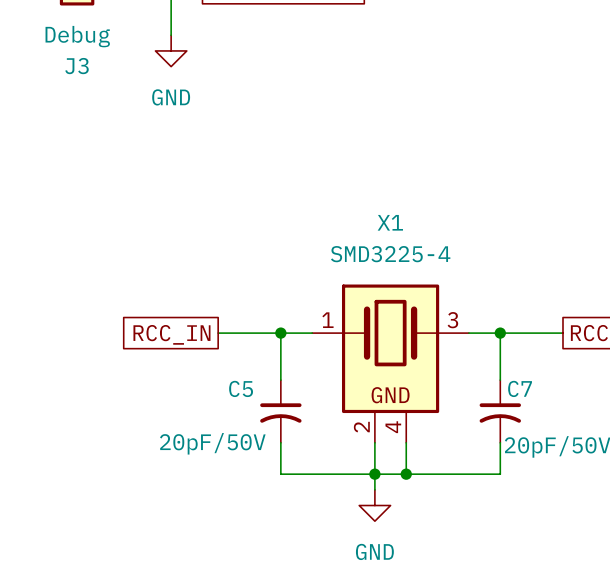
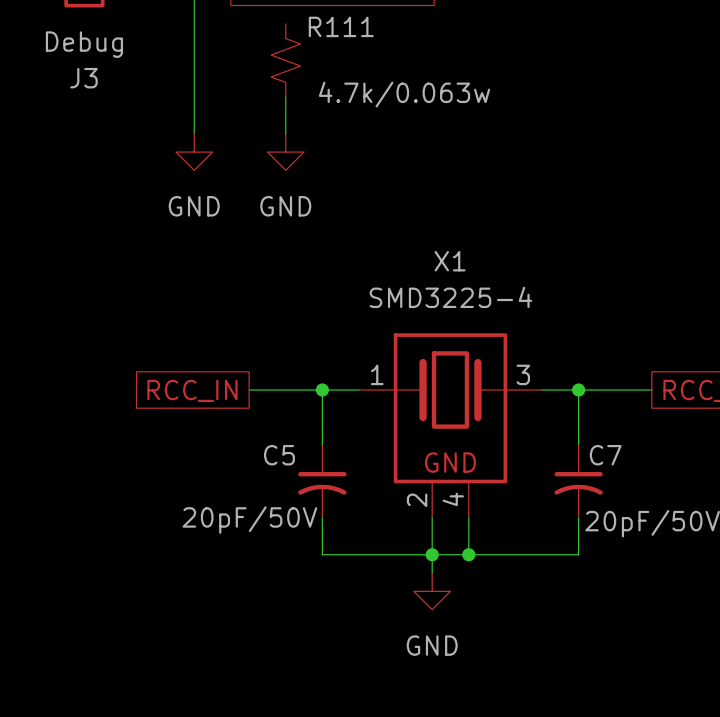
wire: none -> (194, 42) (194, 133)
power symbol: GND (171, 50) -> none
R111: none -> 4.7k/0.063w (285, 60)
wire: none -> (285, 97) (285, 133)
power symbol: none -> GND (194, 152)
power symbol: none -> GND (285, 152)

